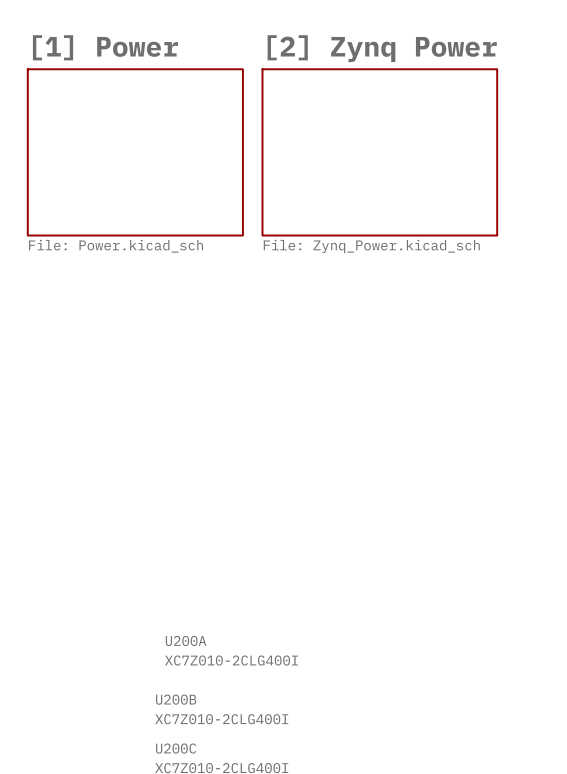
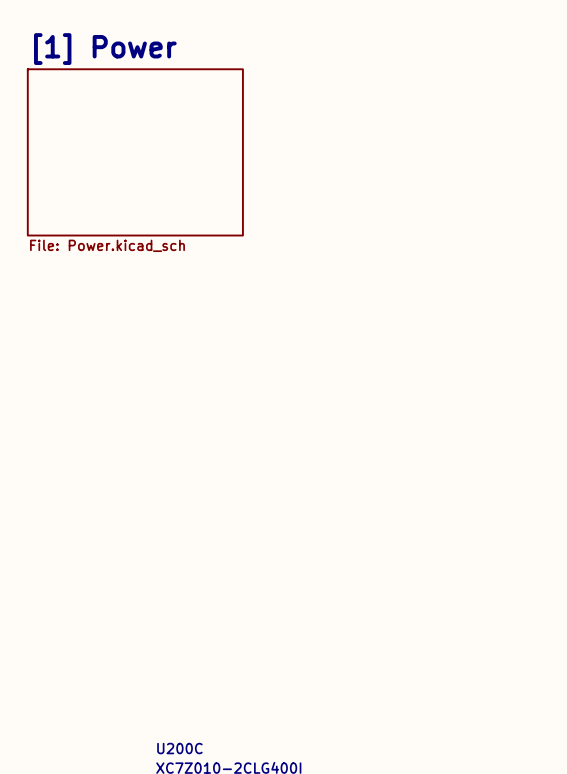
sheet [2] Zynq Power: File: Zynq_Power.kicad_sch (379, 152) -> none
U200A: XC7Z010-2CLG400I (231, 650) -> none
U200B: XC7Z010-2CLG400I (221, 709) -> none

